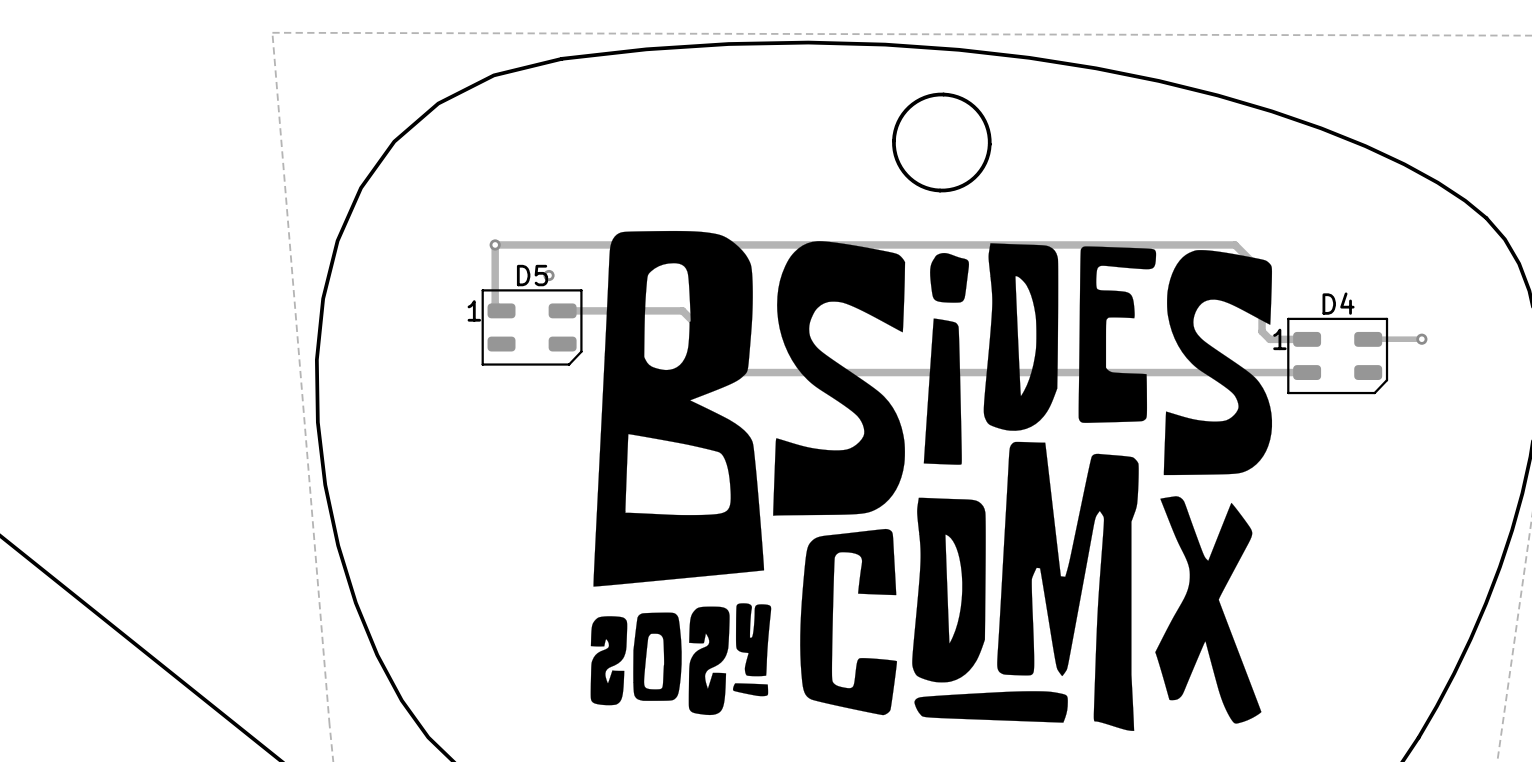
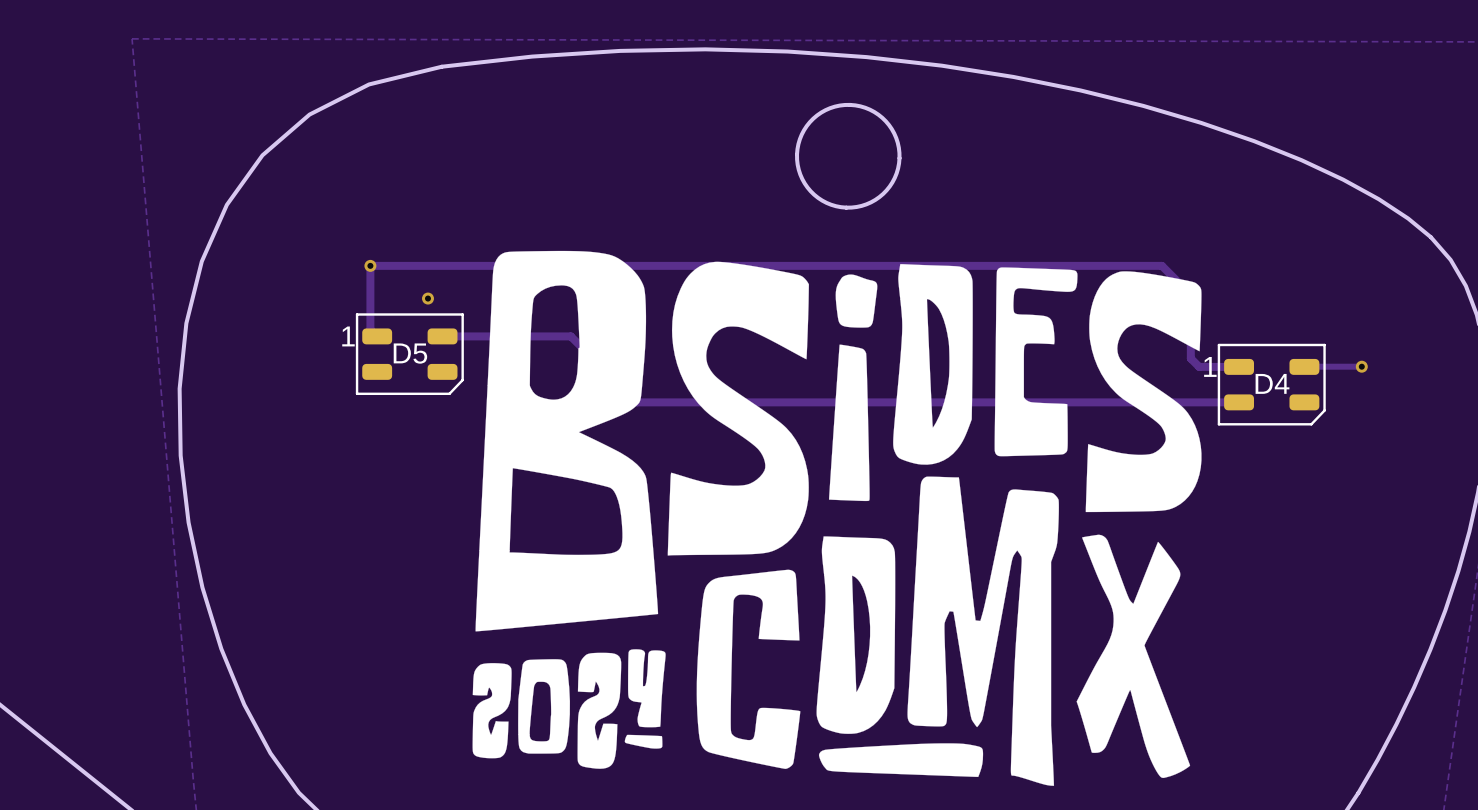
D5 name position: D5 (532, 275) -> D5 (410, 353)
D4 name position: D4 (1338, 303) -> D4 (1272, 383)

